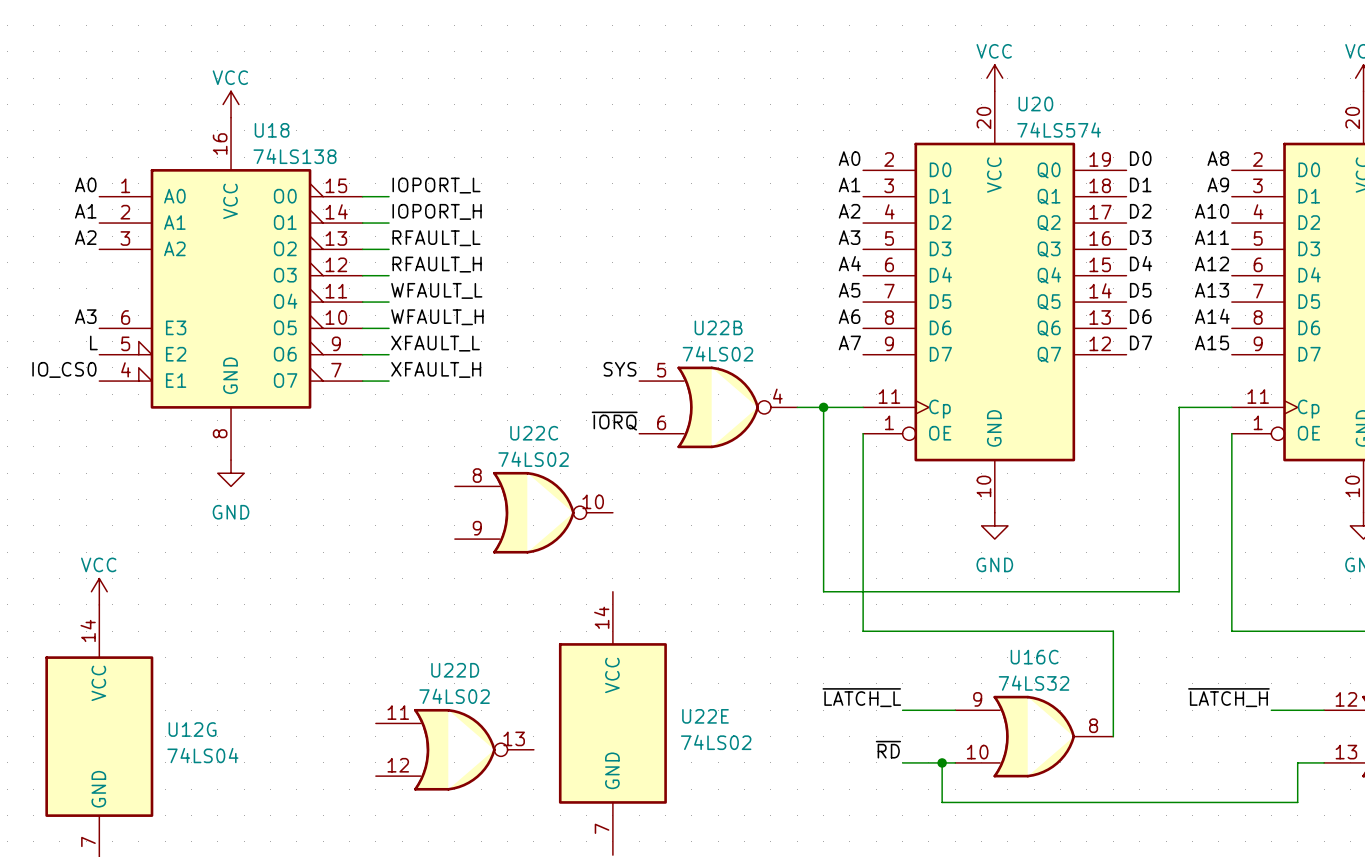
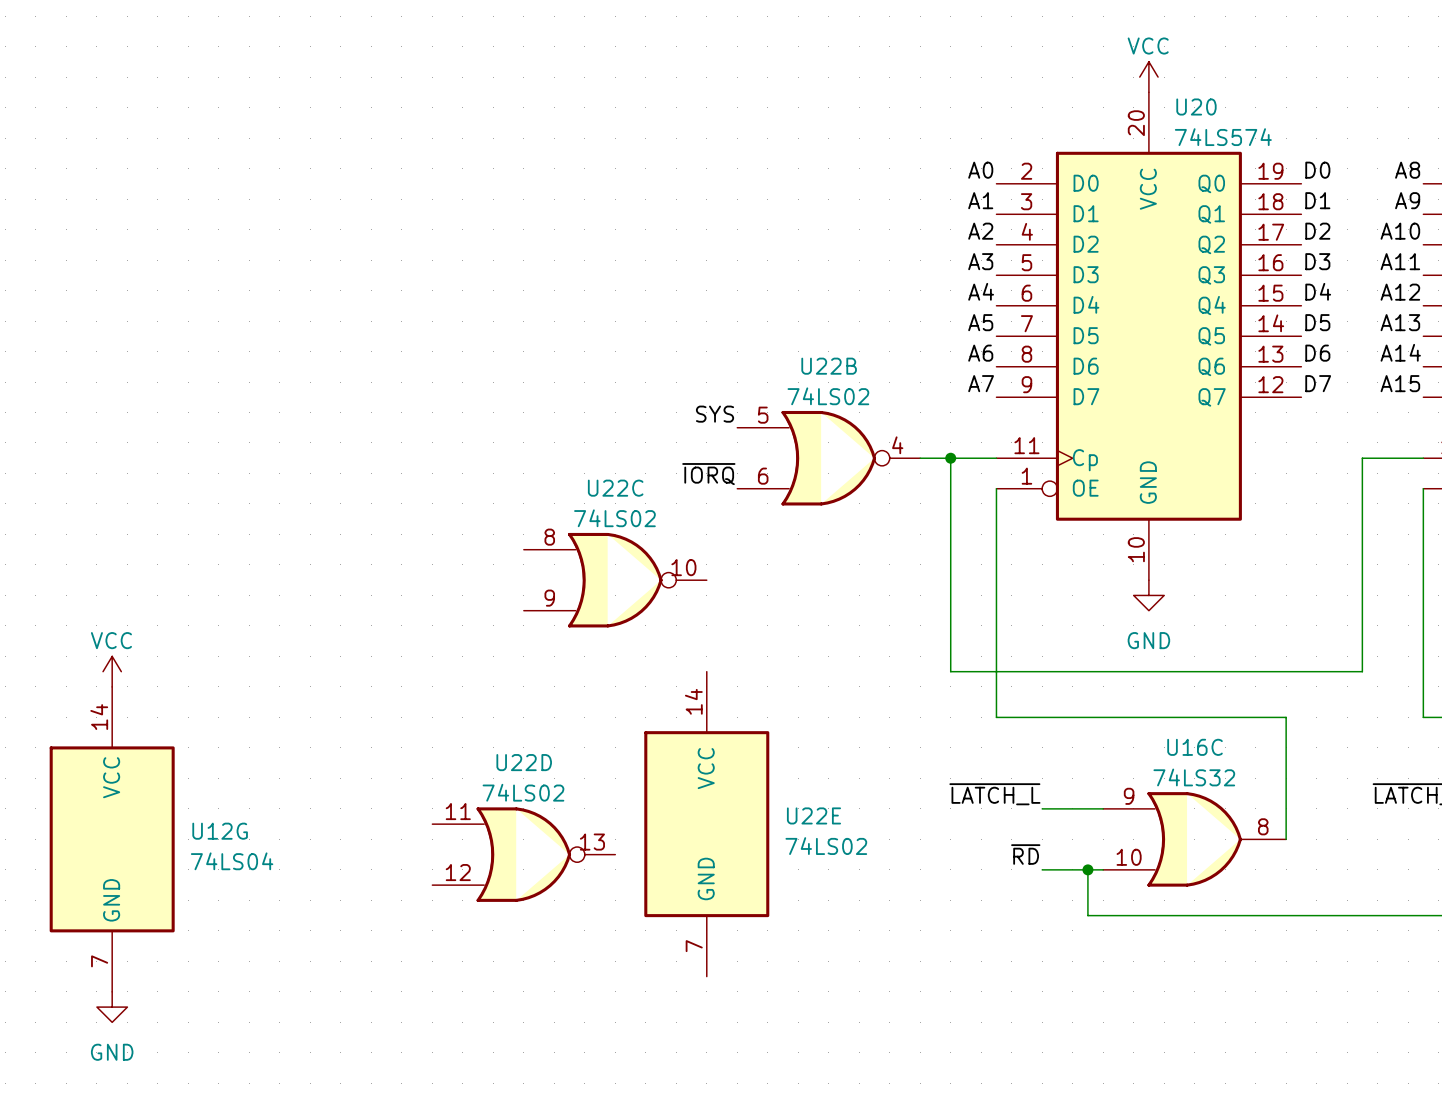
power symbol: VCC (231, 104) -> none
label: A0 (85, 184) -> none
label: IOPORT_L (436, 185) -> none
wire: (362, 196) (389, 196) -> none
label: A1 (85, 211) -> none
label: IOPORT_H (437, 211) -> none
wire: (362, 223) (389, 223) -> none
label: A2 (85, 237) -> none
label: RFAULT_L (436, 238) -> none
wire: (362, 249) (389, 249) -> none
label: RFAULT_H (437, 264) -> none
wire: (362, 275) (389, 275) -> none
U18: 74LS138 (231, 288) -> none
label: WFAULT_L (436, 290) -> none
wire: (362, 302) (389, 302) -> none
label: A3 (85, 316) -> none
label: WFAULT_H (437, 317) -> none
wire: (362, 328) (389, 328) -> none
label: L (93, 342) -> none
label: XFAULT_L (435, 343) -> none
wire: (362, 354) (389, 354) -> none
label: IO_CS0 (64, 369) -> none
label: XFAULT_H (436, 369) -> none
wire: (362, 381) (389, 381) -> none
power symbol: GND (231, 473) -> none

